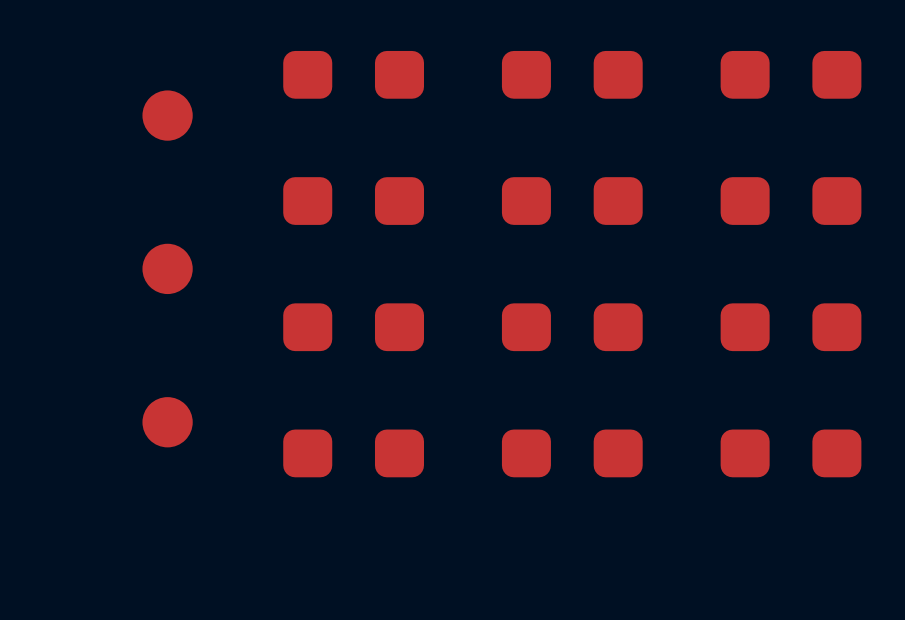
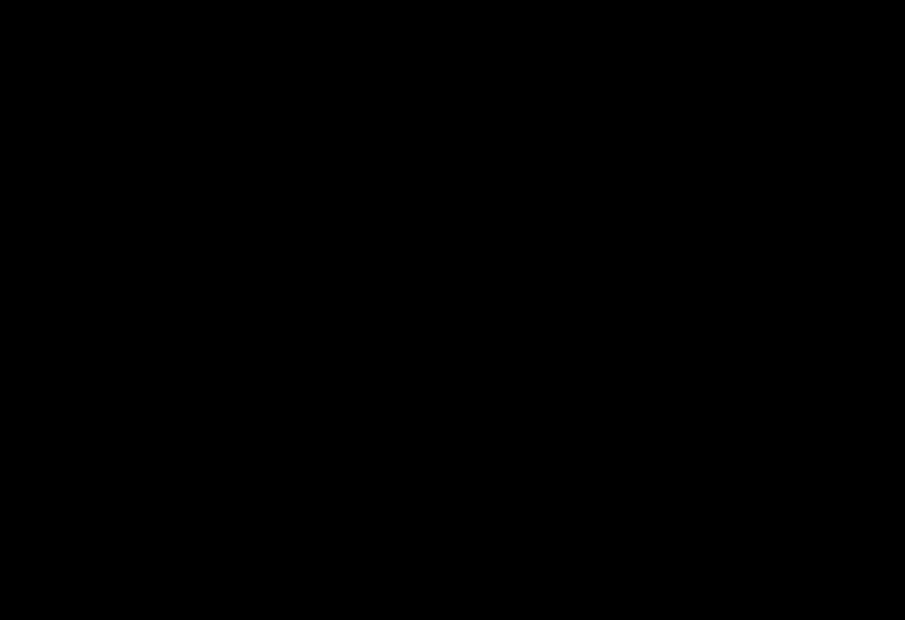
part: (353, 74) -> none
part: (572, 74) -> none
part: (791, 74) -> none
part: (167, 115) -> none
part: (353, 201) -> none
part: (572, 201) -> none
part: (791, 201) -> none
part: (167, 268) -> none
part: (353, 327) -> none
part: (572, 327) -> none
part: (791, 327) -> none
part: (167, 422) -> none
part: (353, 453) -> none
part: (572, 453) -> none
part: (791, 453) -> none

